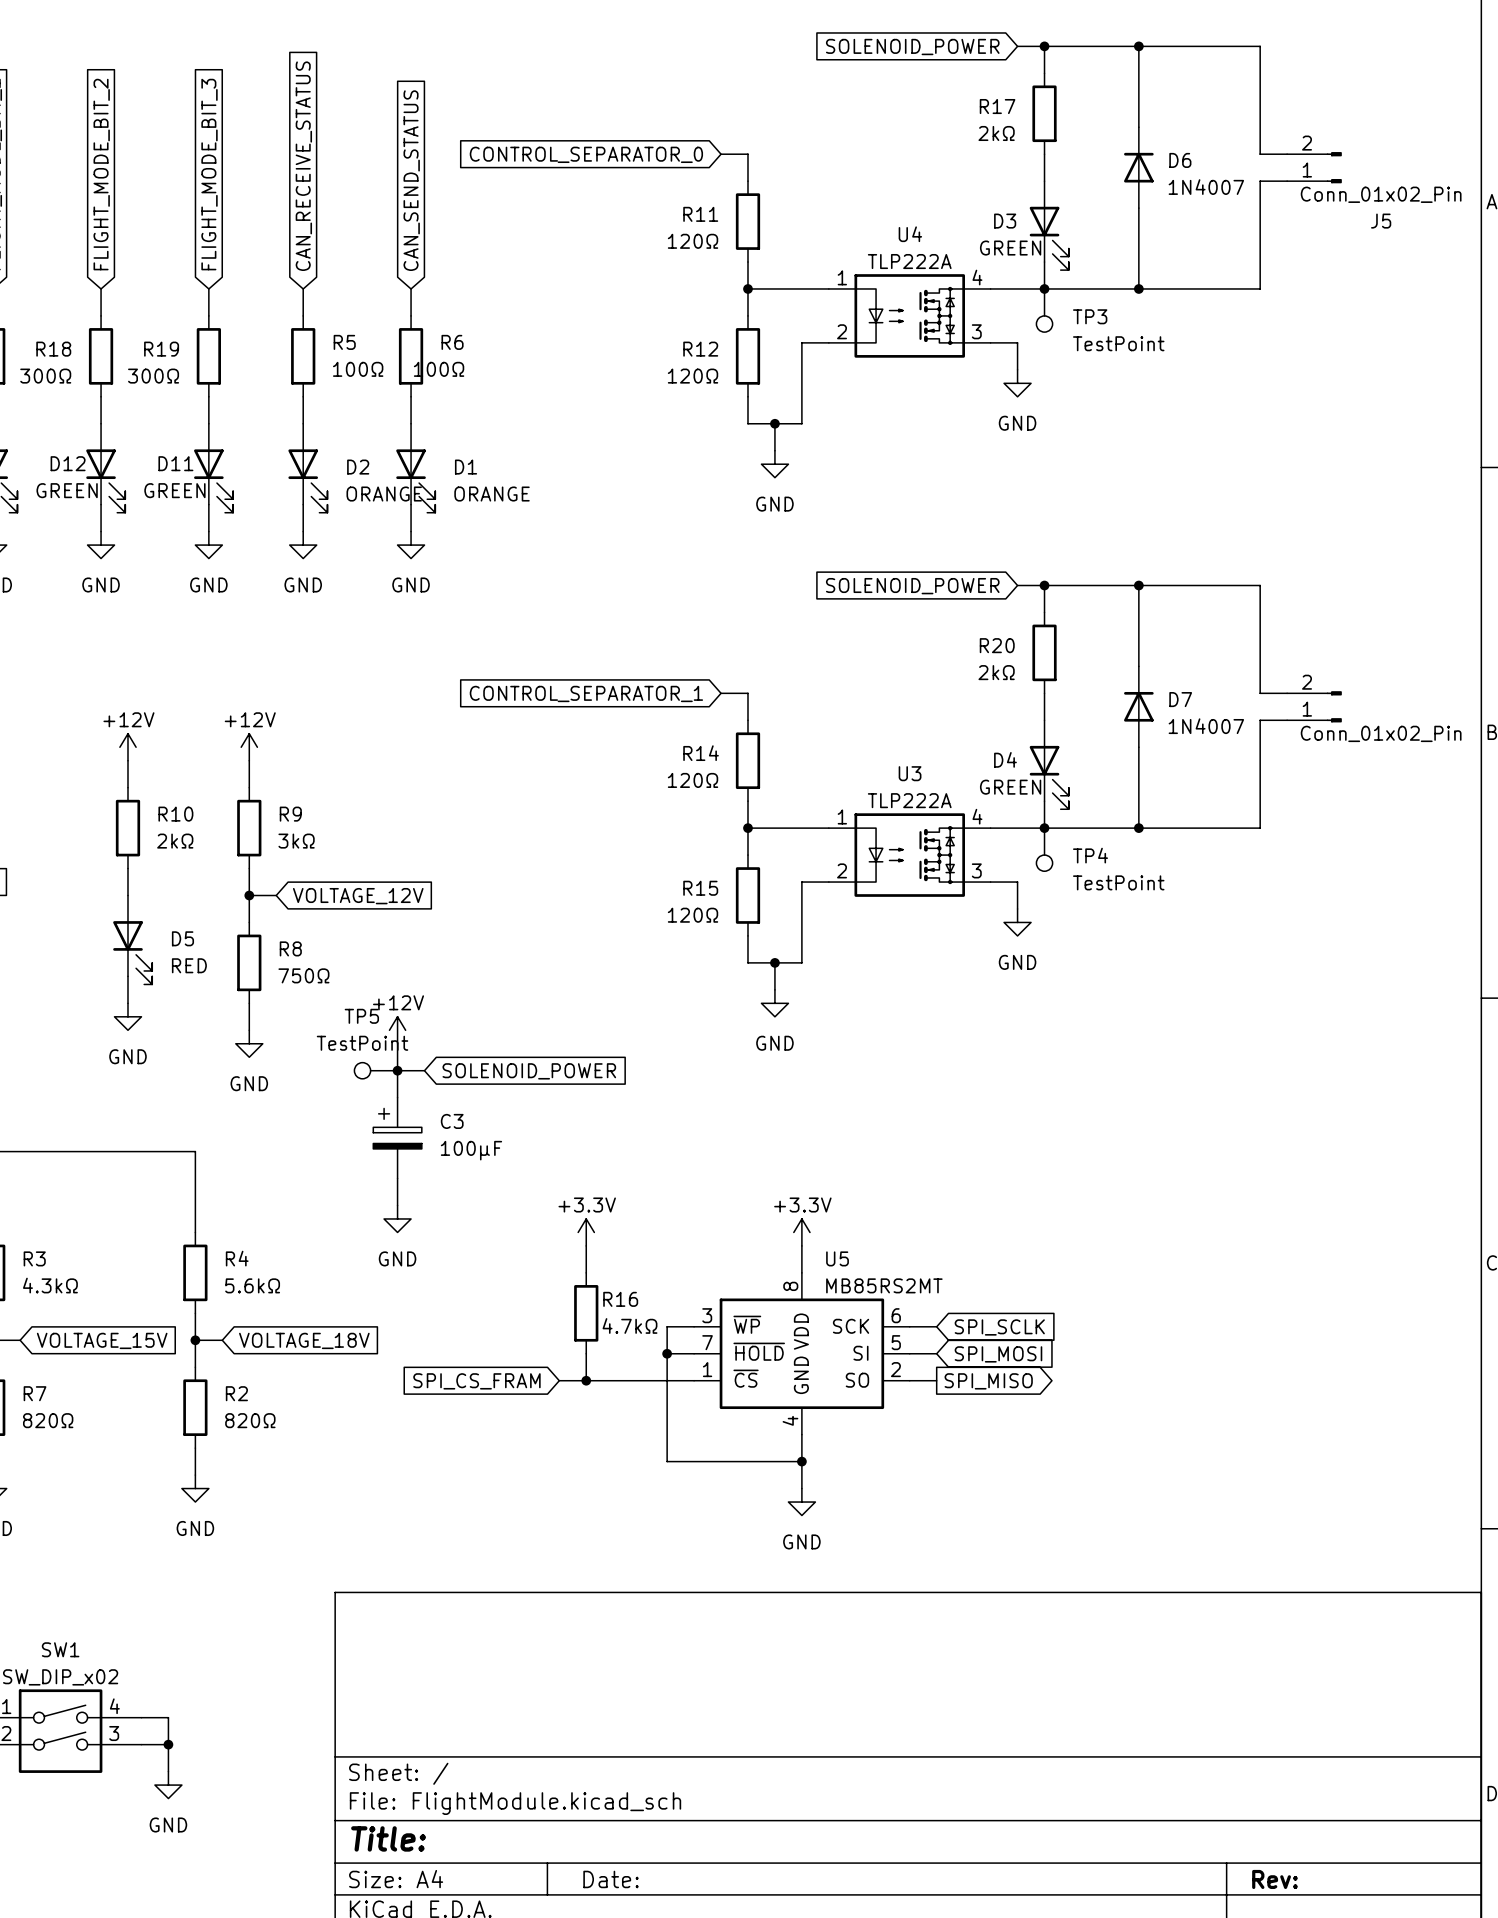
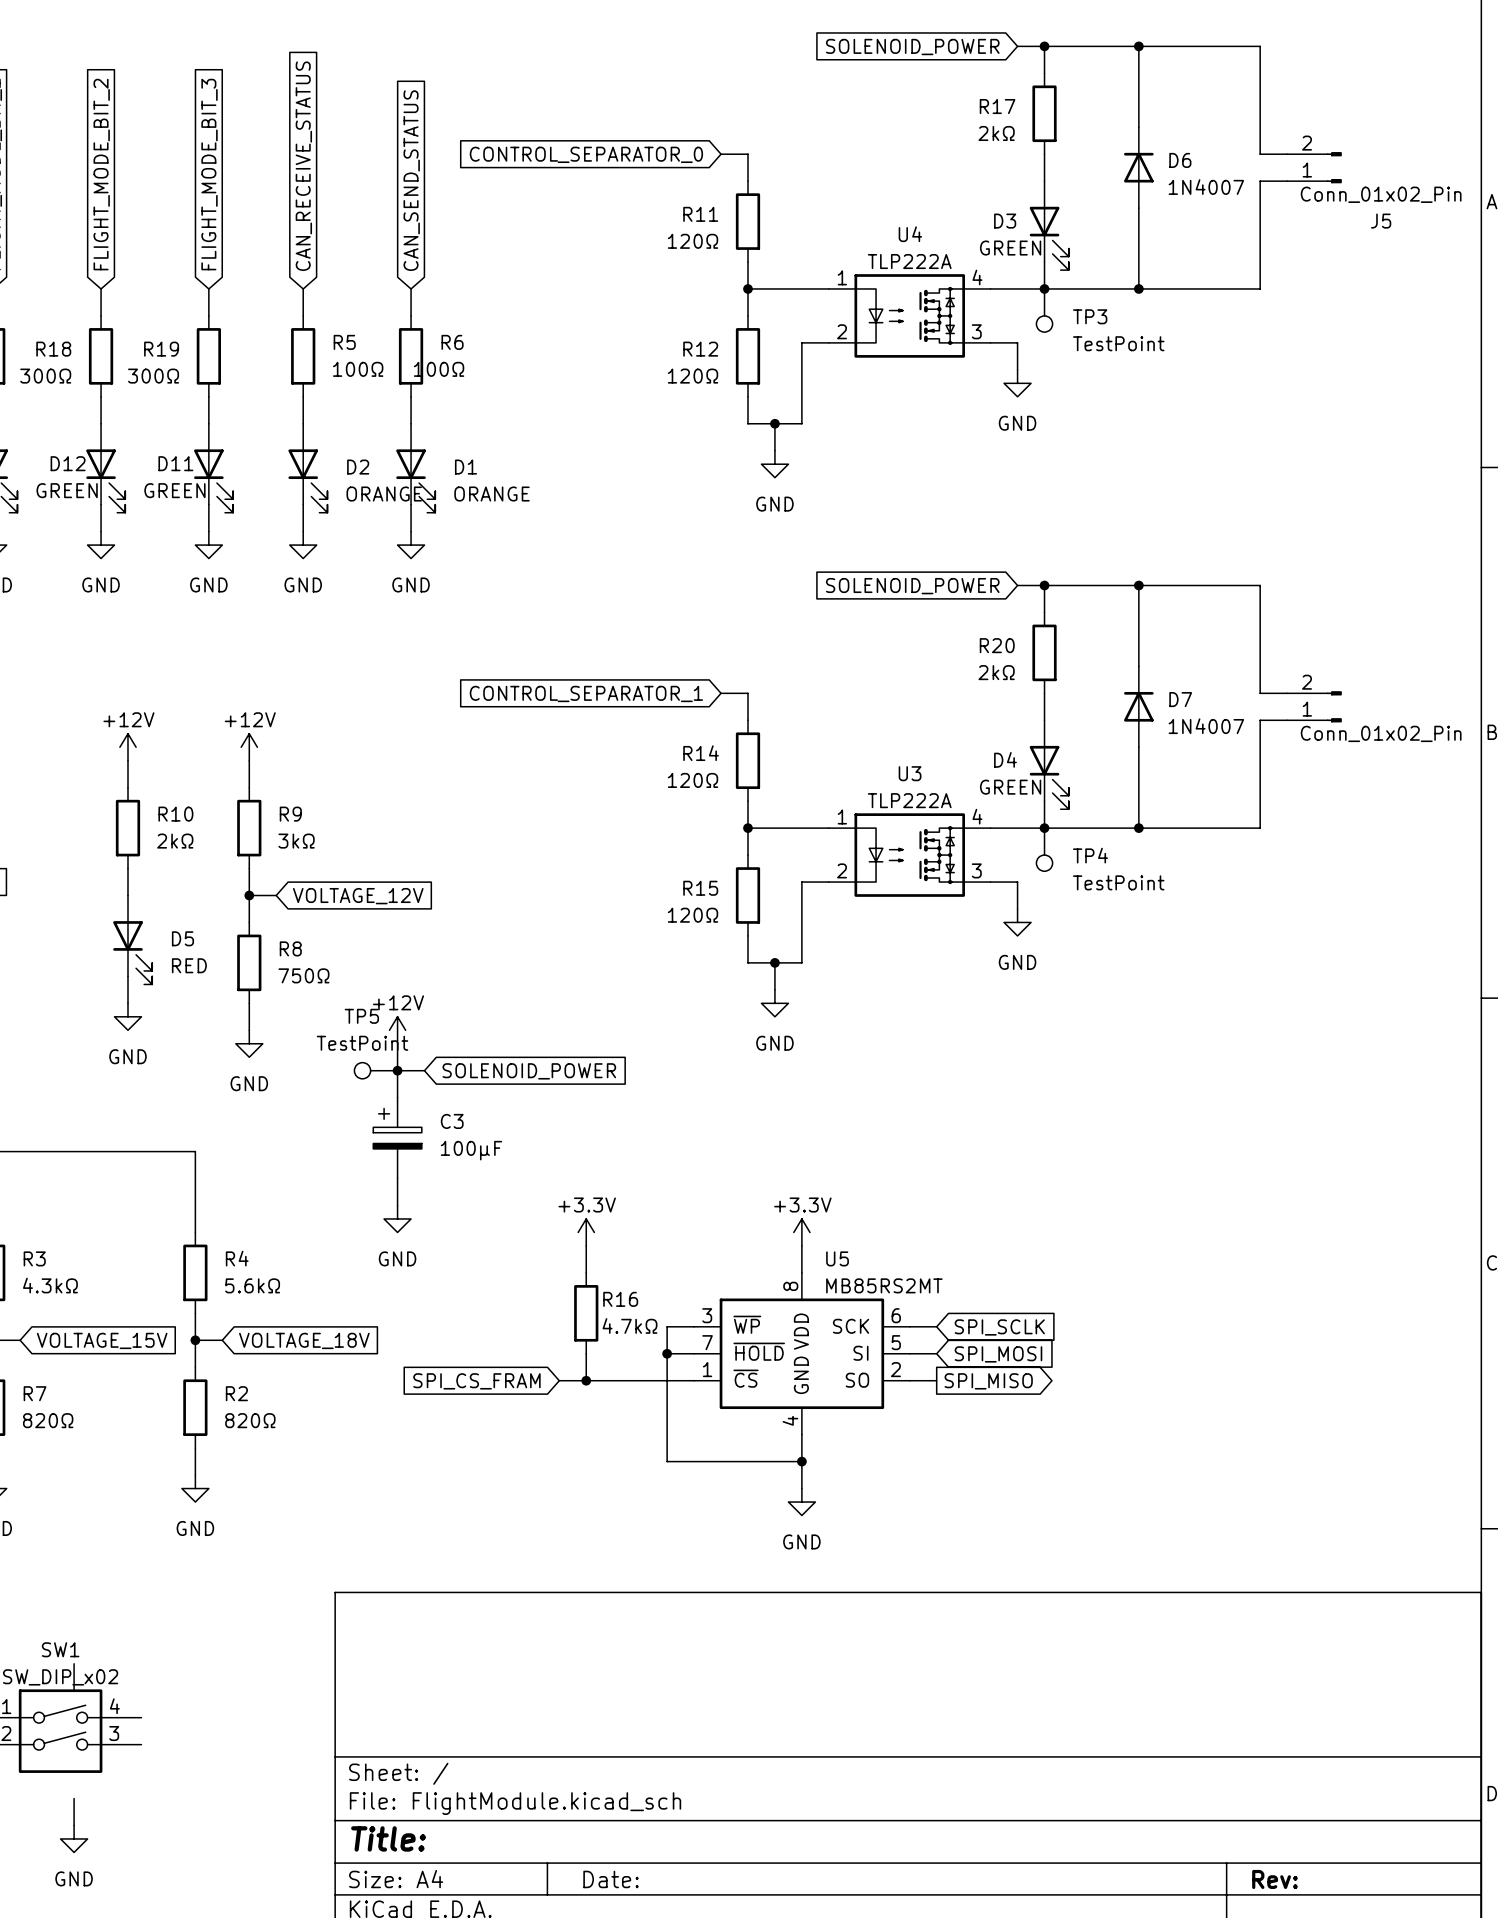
wire: none -> (74, 1663) (74, 1690)
wire: (141, 1717) (168, 1717) (168, 1771) -> none
wire: (141, 1744) (168, 1744) -> none
junction: (168, 1744) -> none
power symbol position: GND (168, 1785) -> GND (74, 1838)
wire: none -> (74, 1798) (74, 1825)

